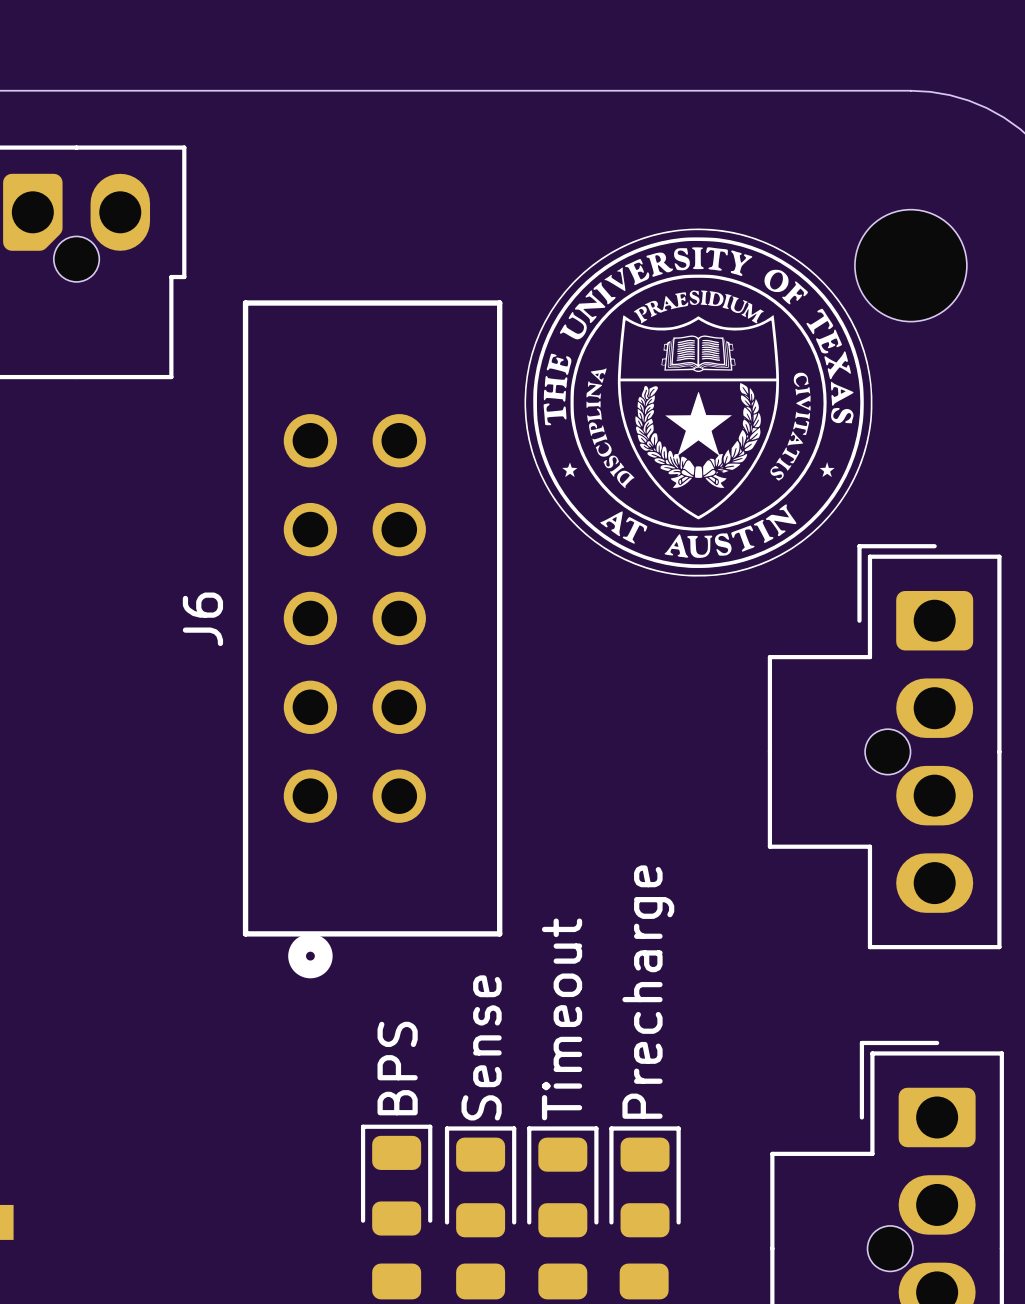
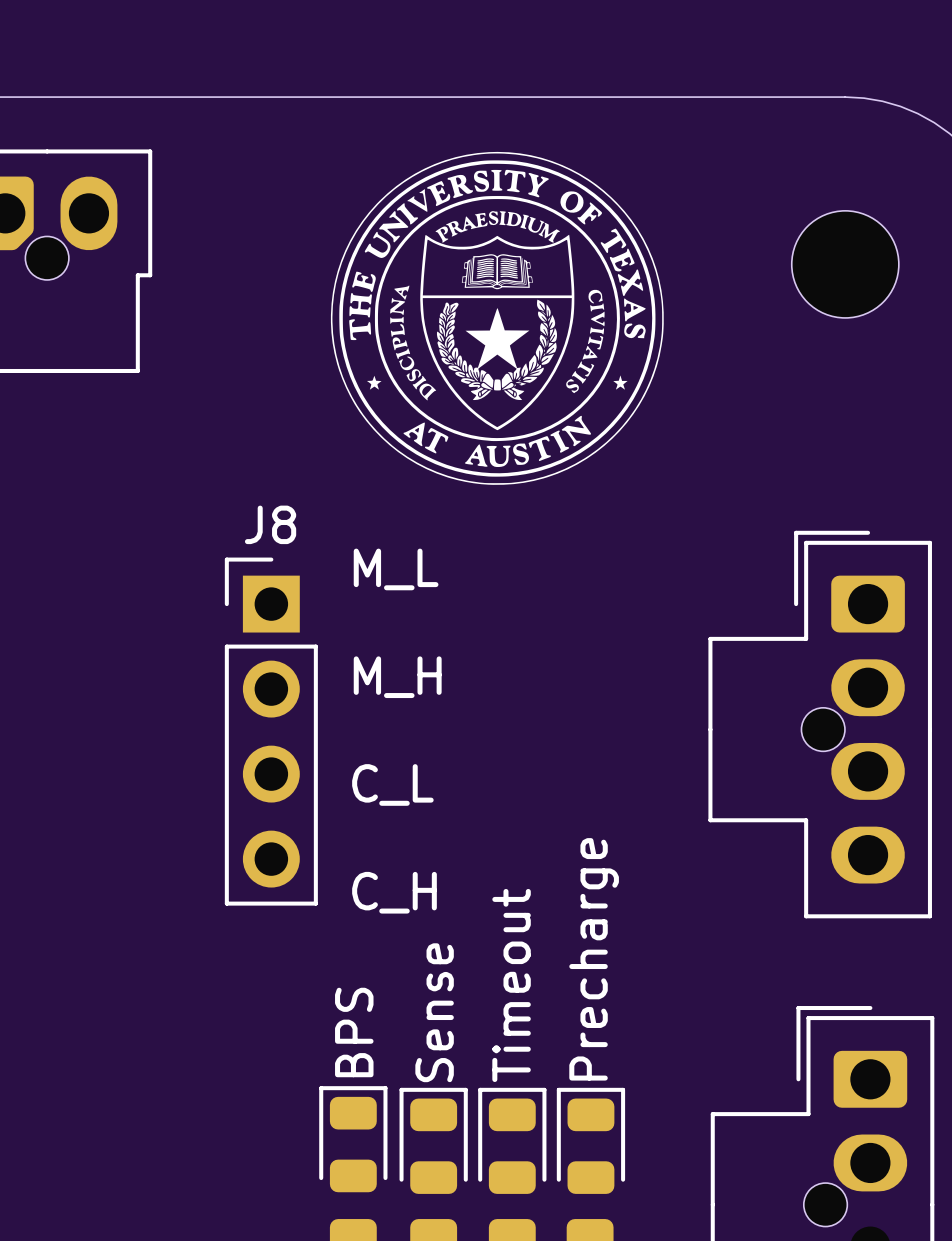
drawing position: (698, 402) -> (497, 318)
text: none -> M_L (396, 569)
J6: (372, 639) -> none
text: none -> M_H (397, 677)
J8: none -> (271, 731)
text: none -> C_L (392, 784)
text: none -> C_H (394, 892)

